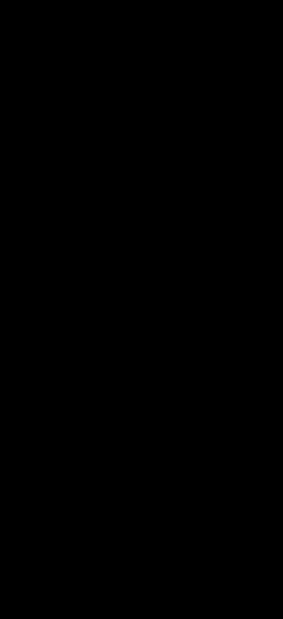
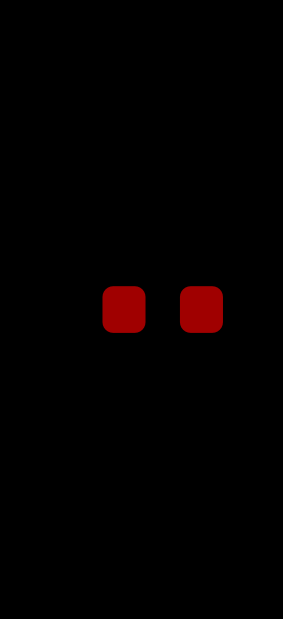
part: none -> (162, 309)

